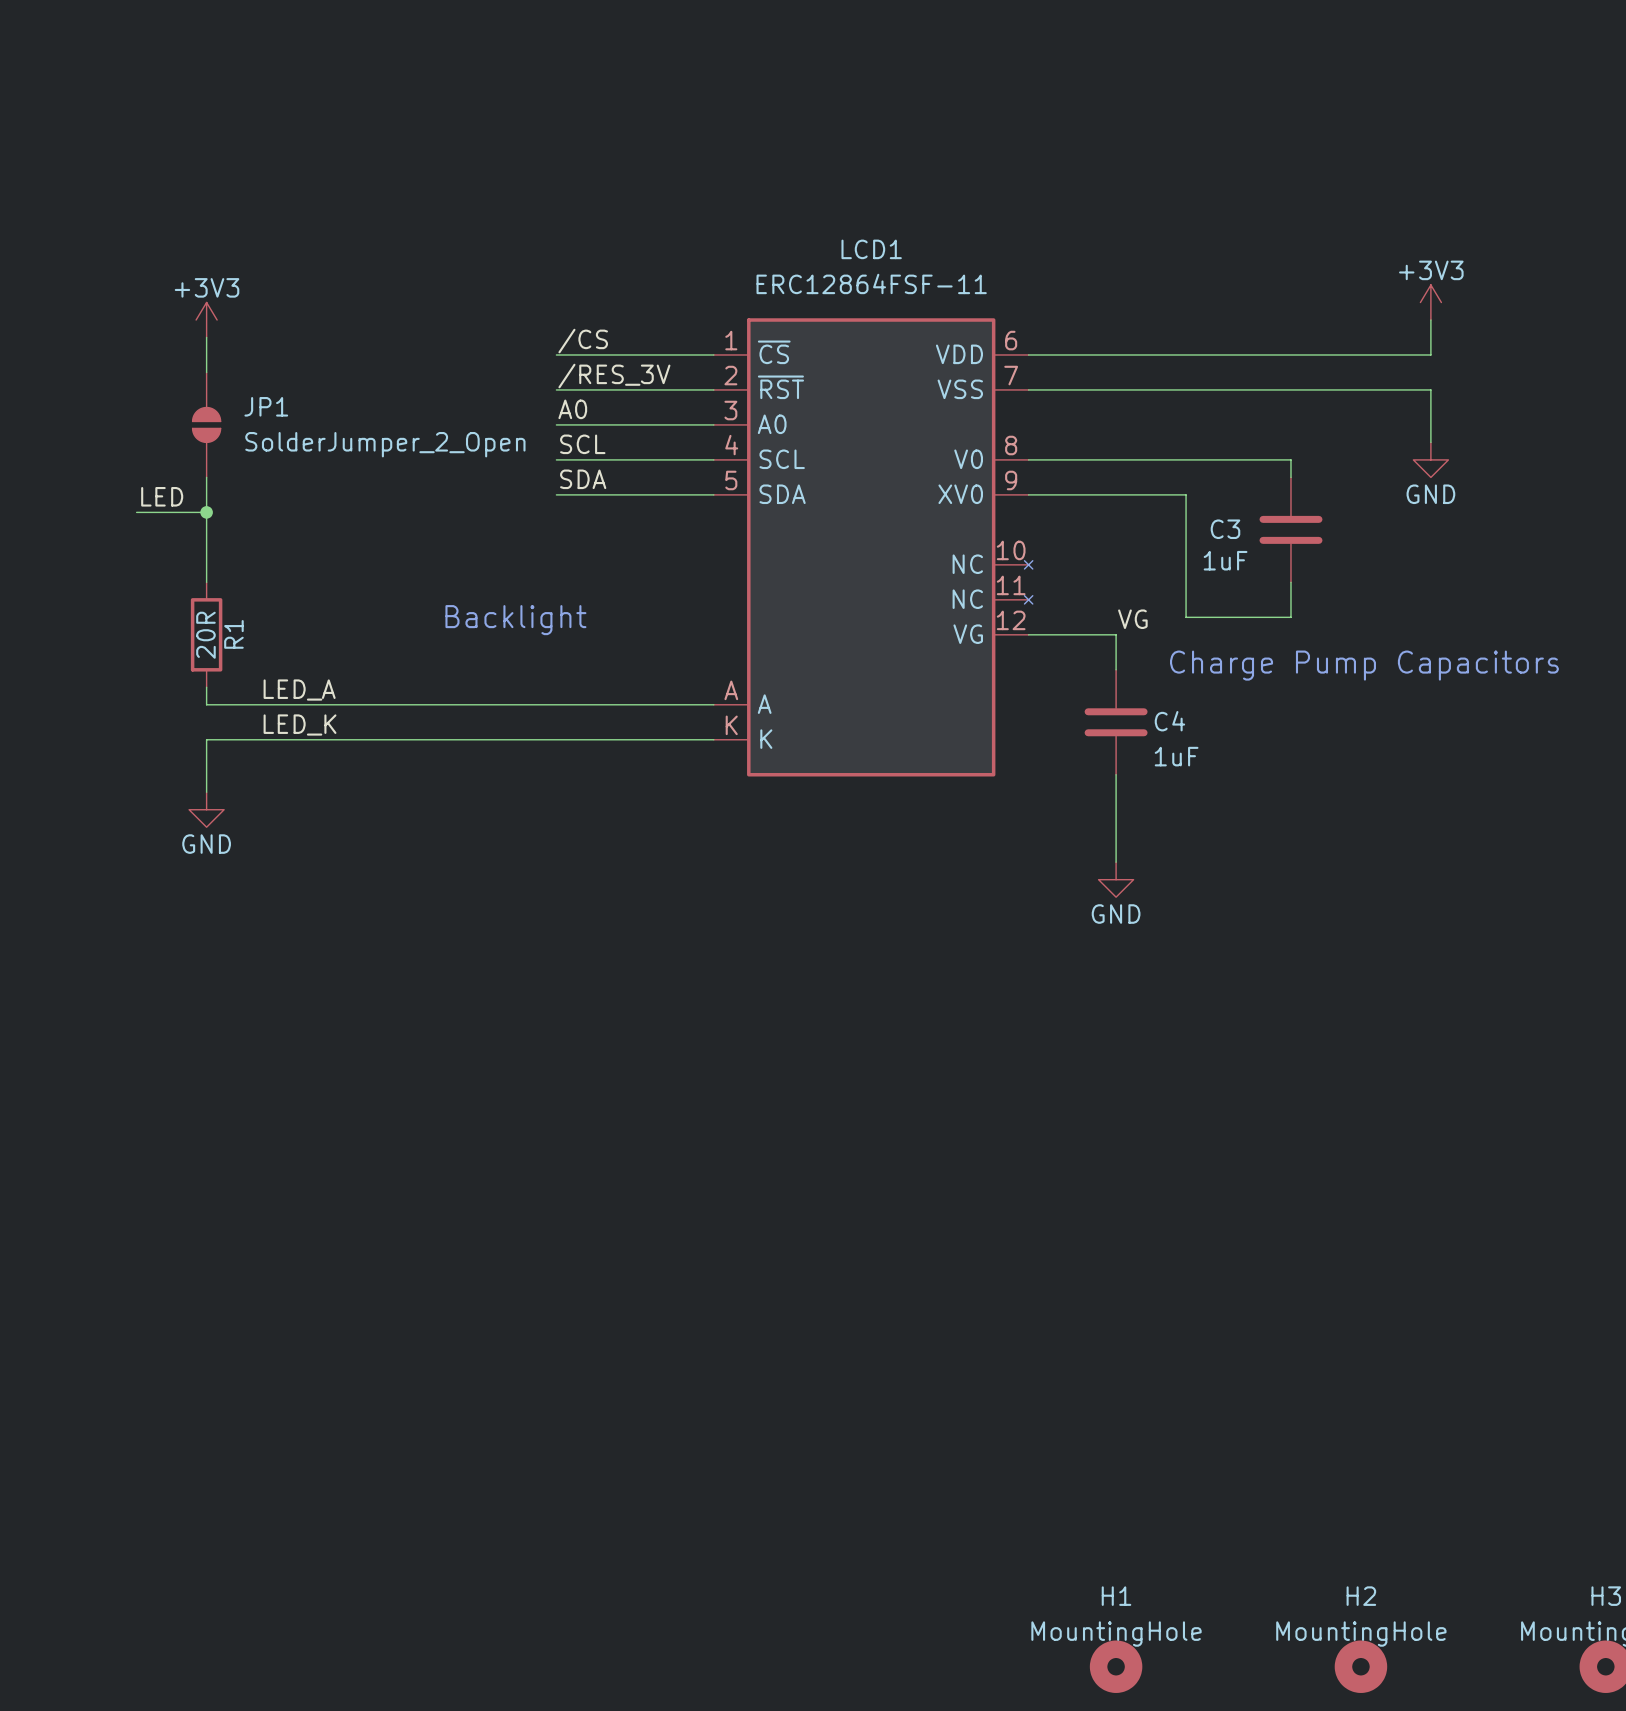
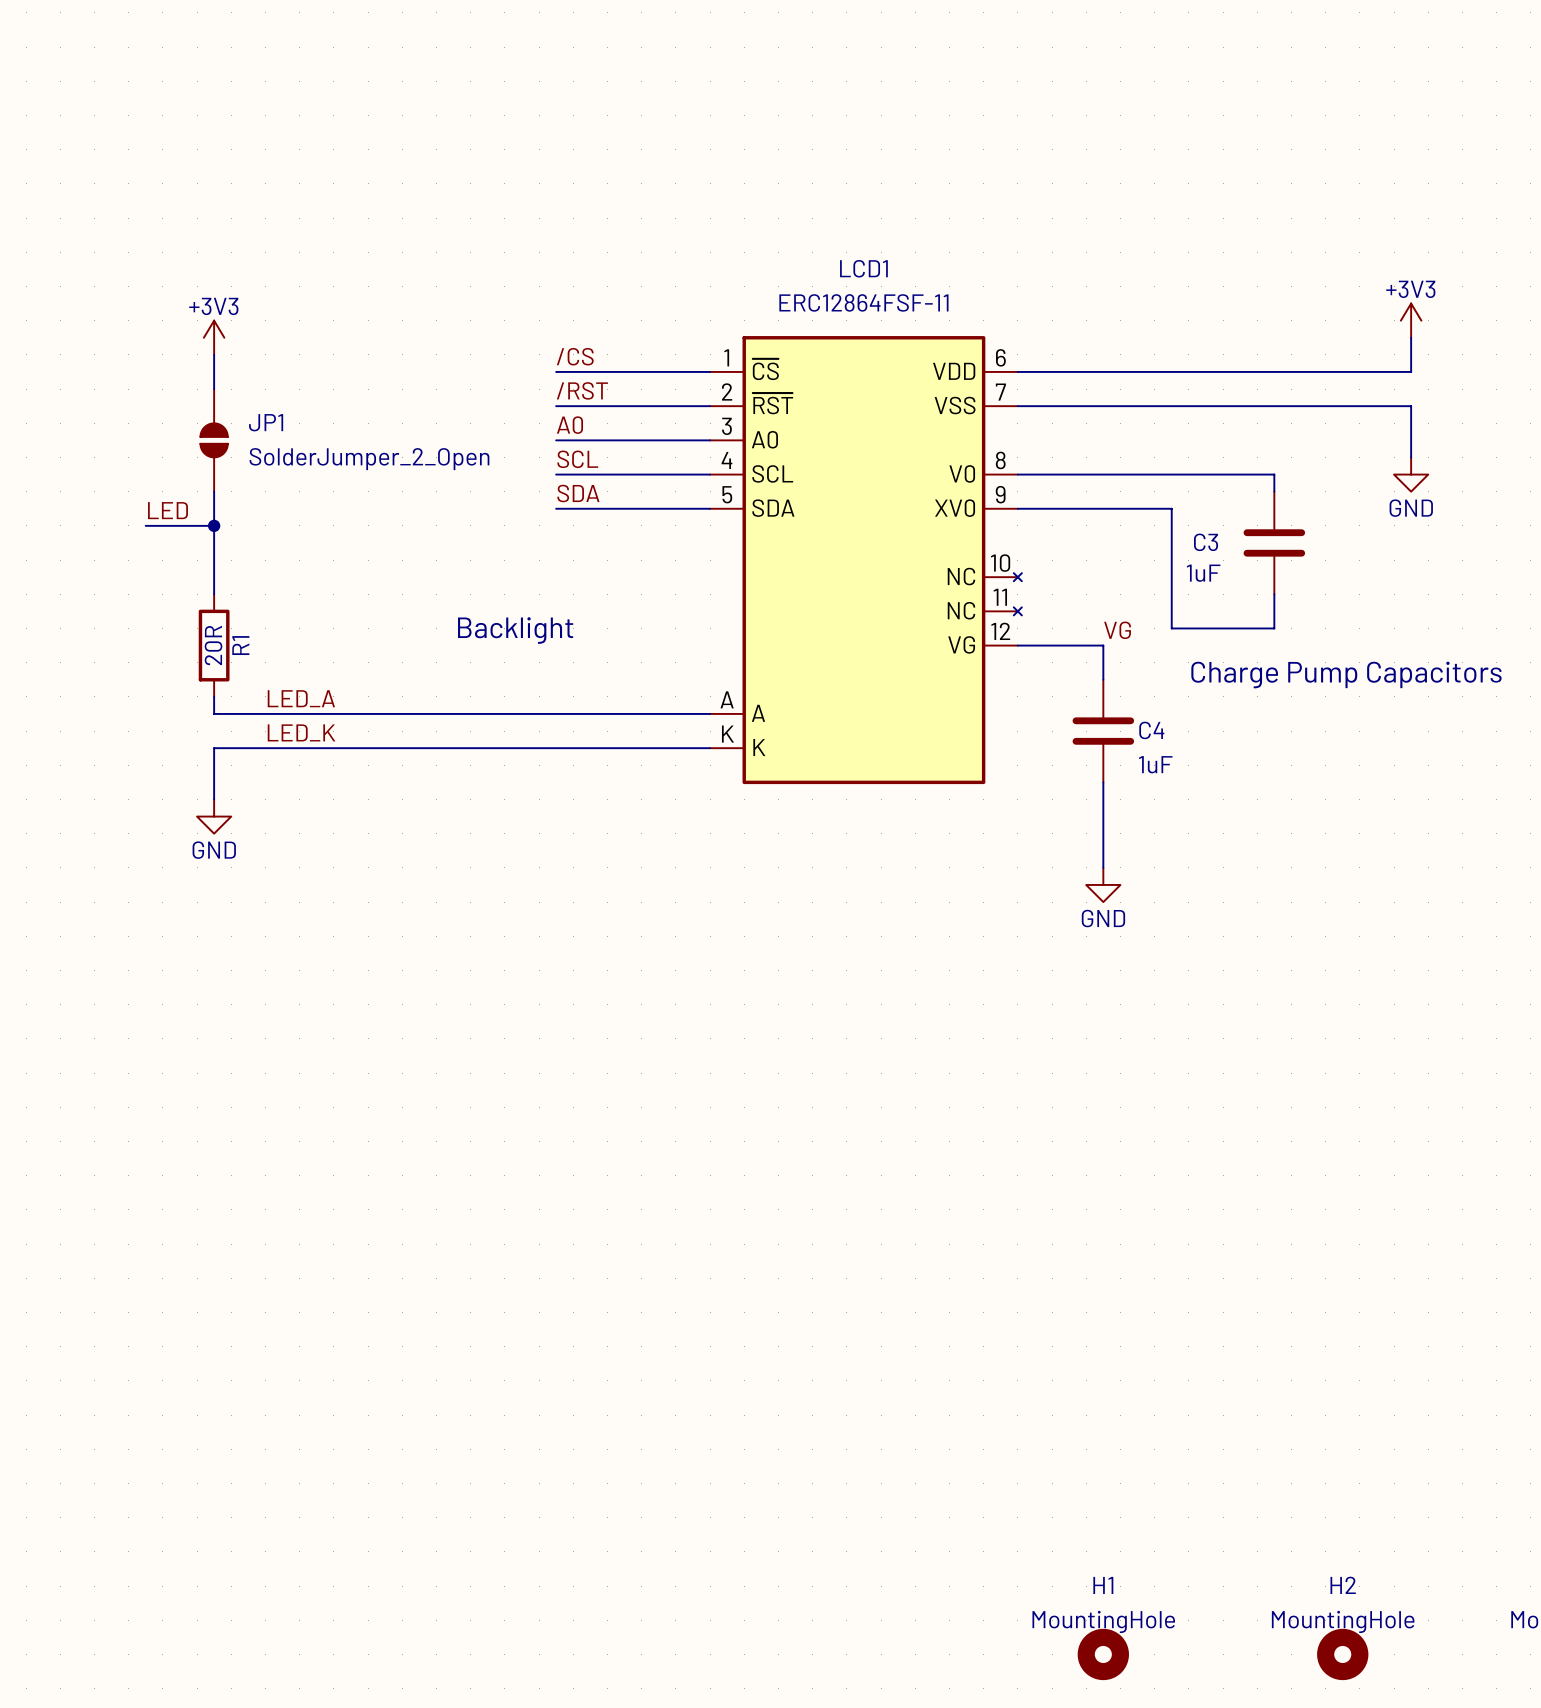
label: /RES_3V (614, 376) -> /RST (582, 390)

